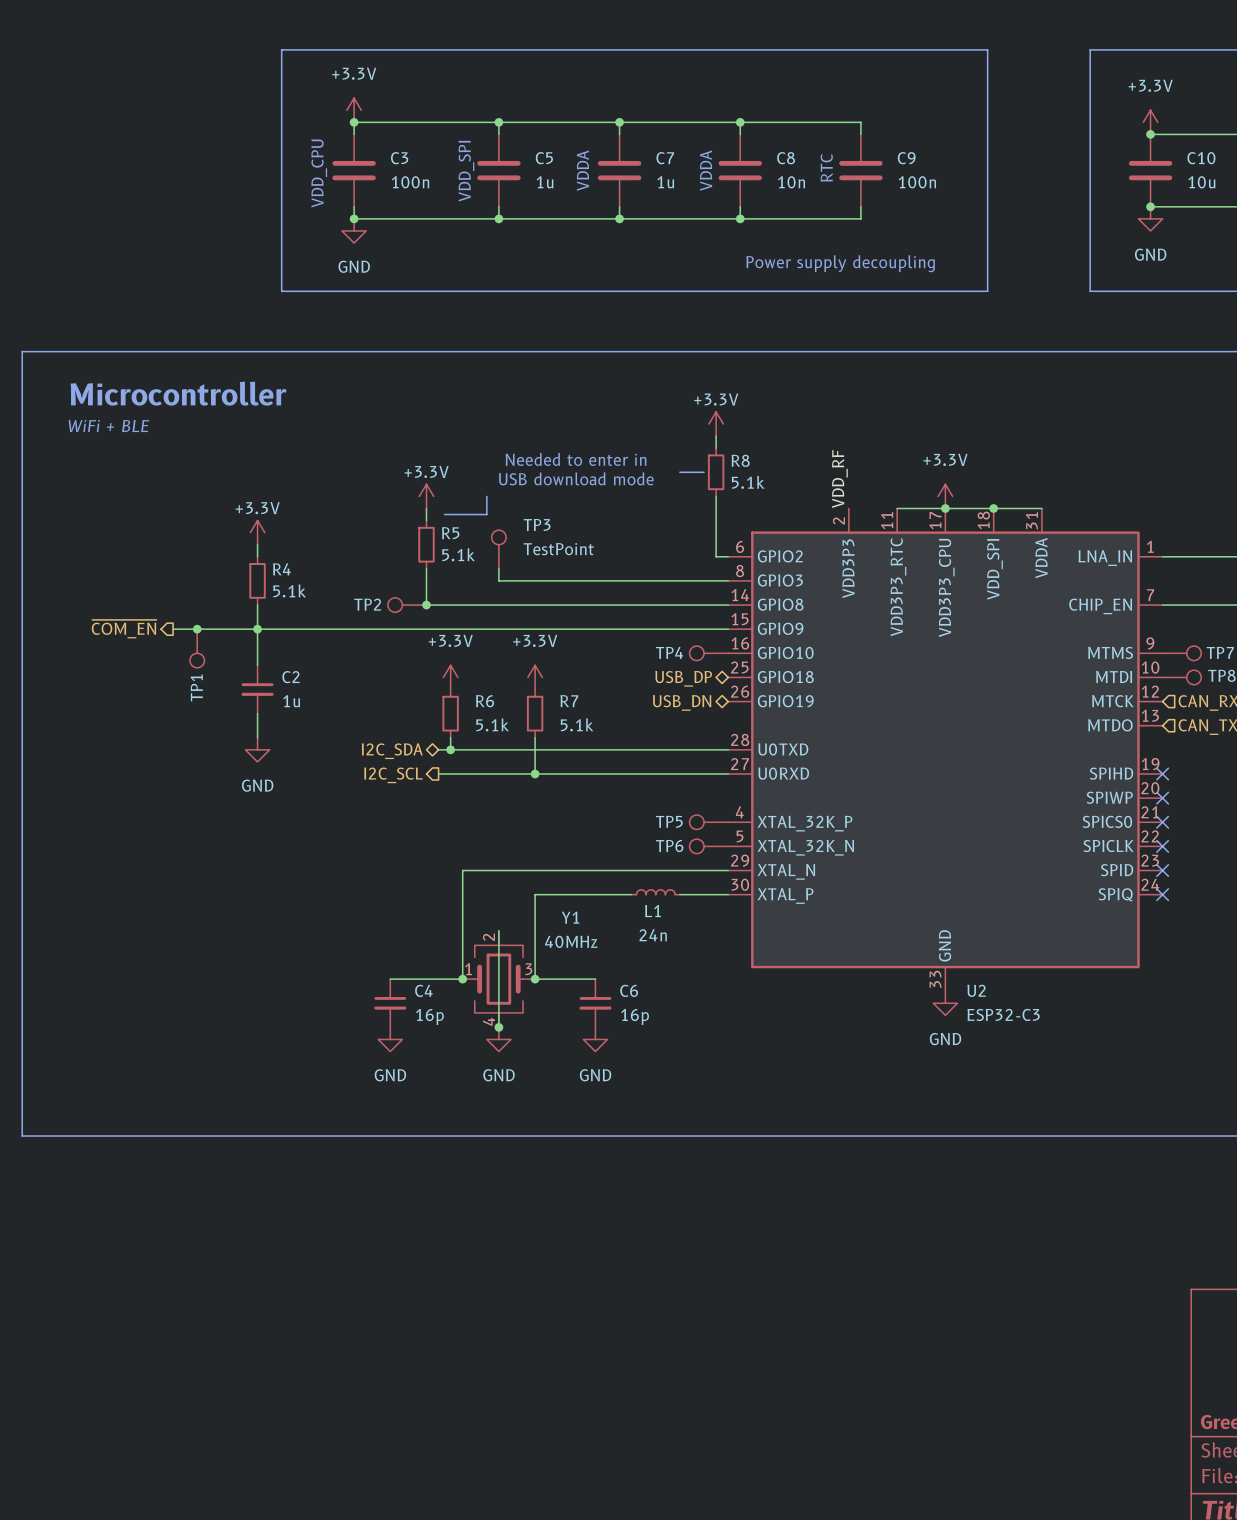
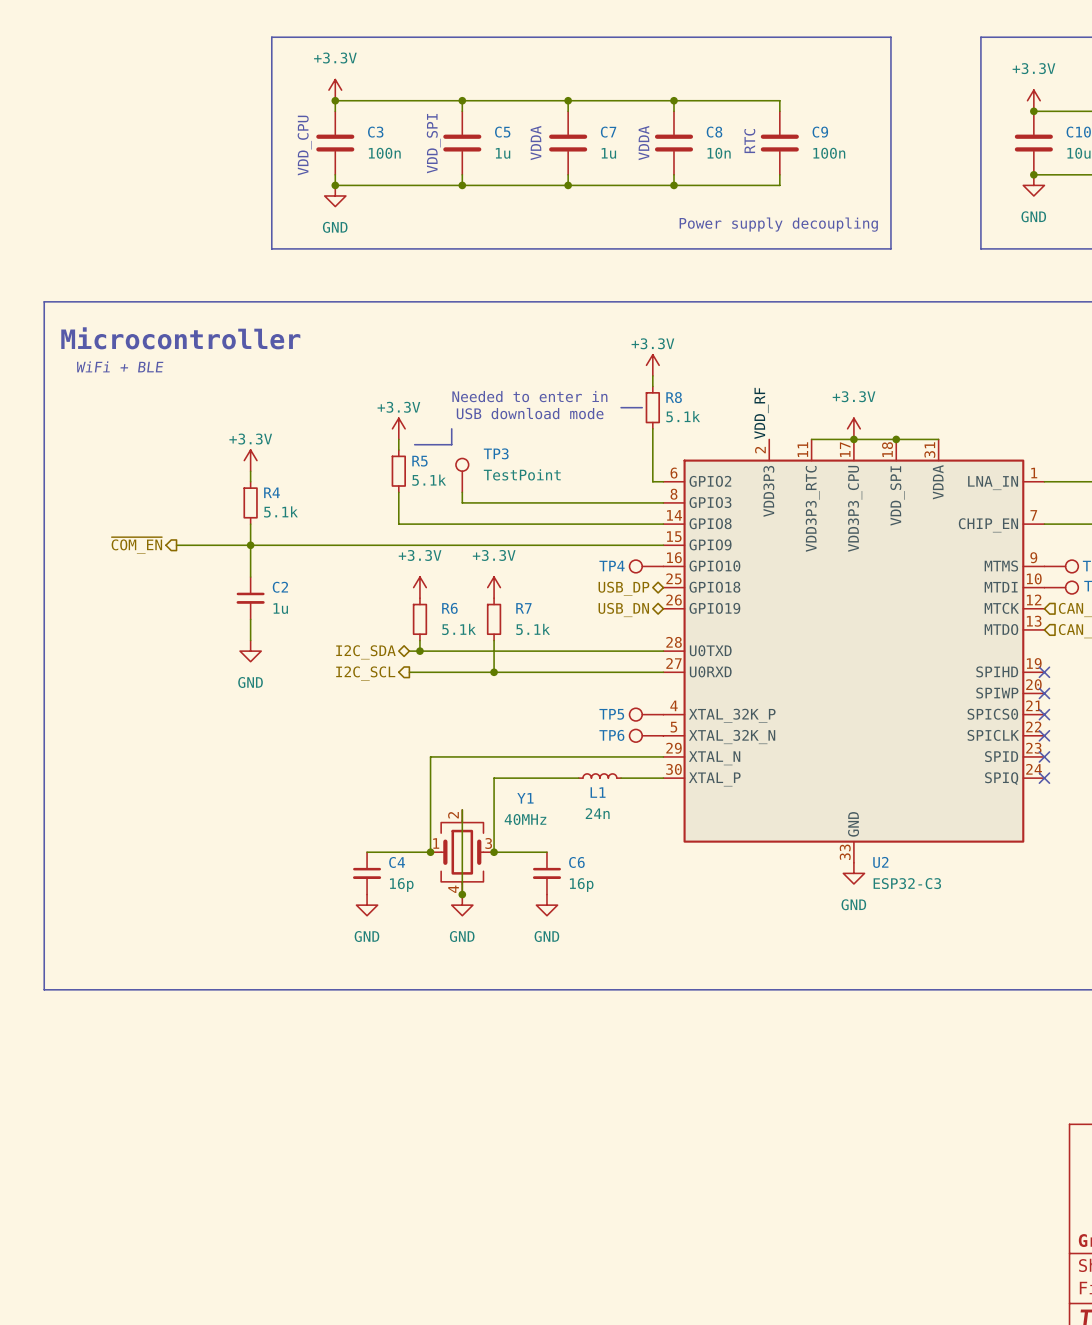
TP2: (407, 605) -> none
junction: (426, 605) -> none
junction: (197, 629) -> none
TP1: (197, 648) -> none

